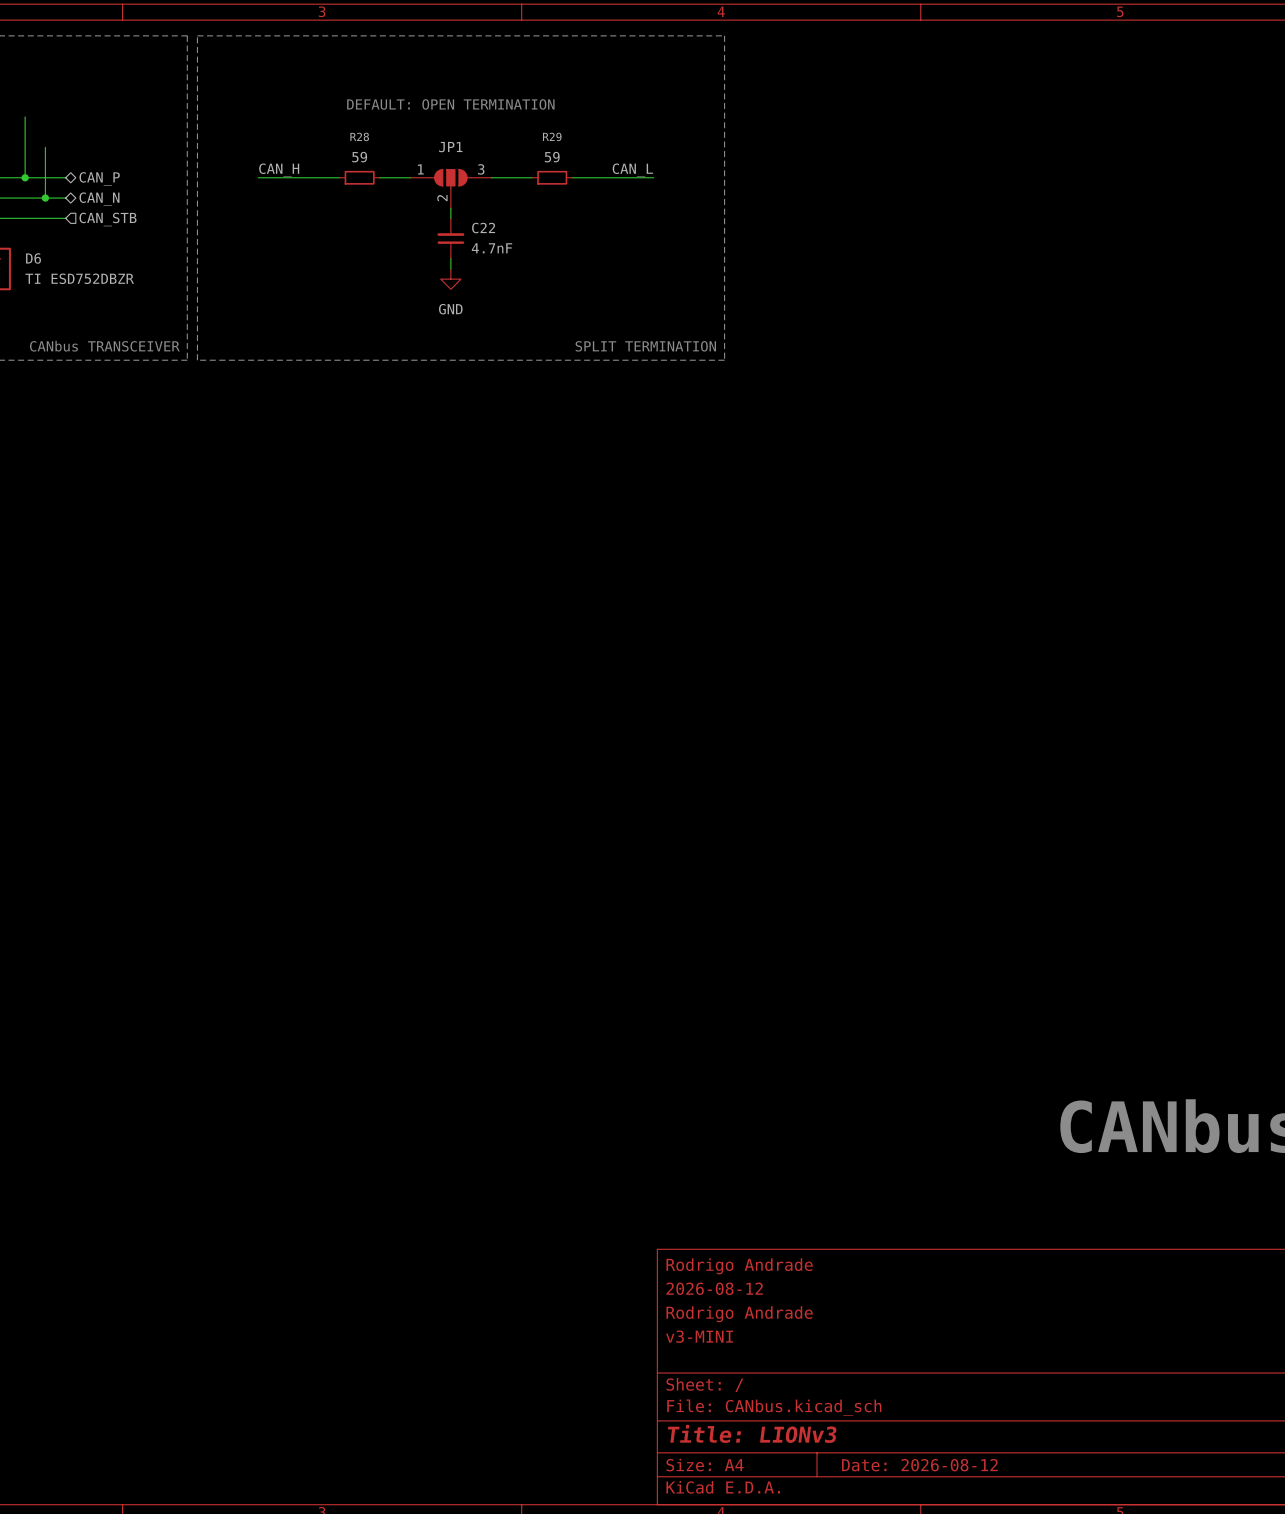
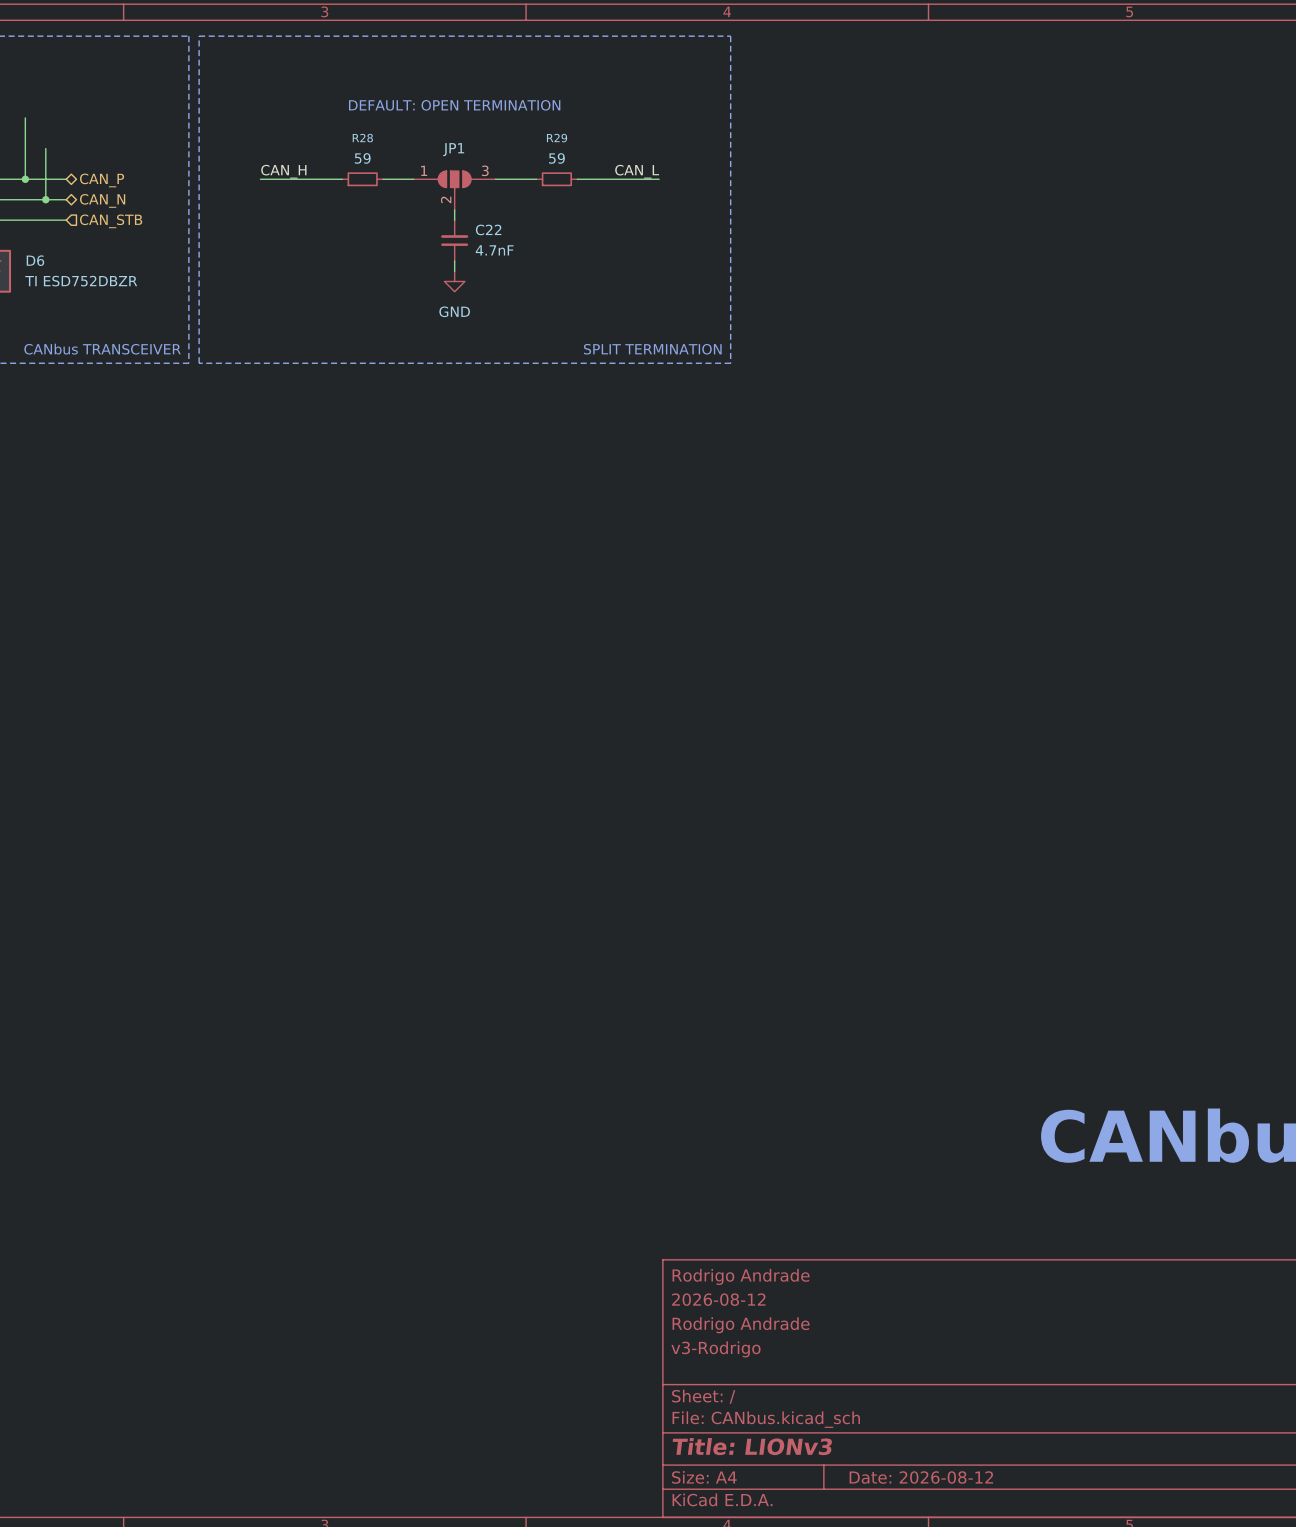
title block: v3-MINI (699, 1336) -> v3-Rodrigo (716, 1349)

